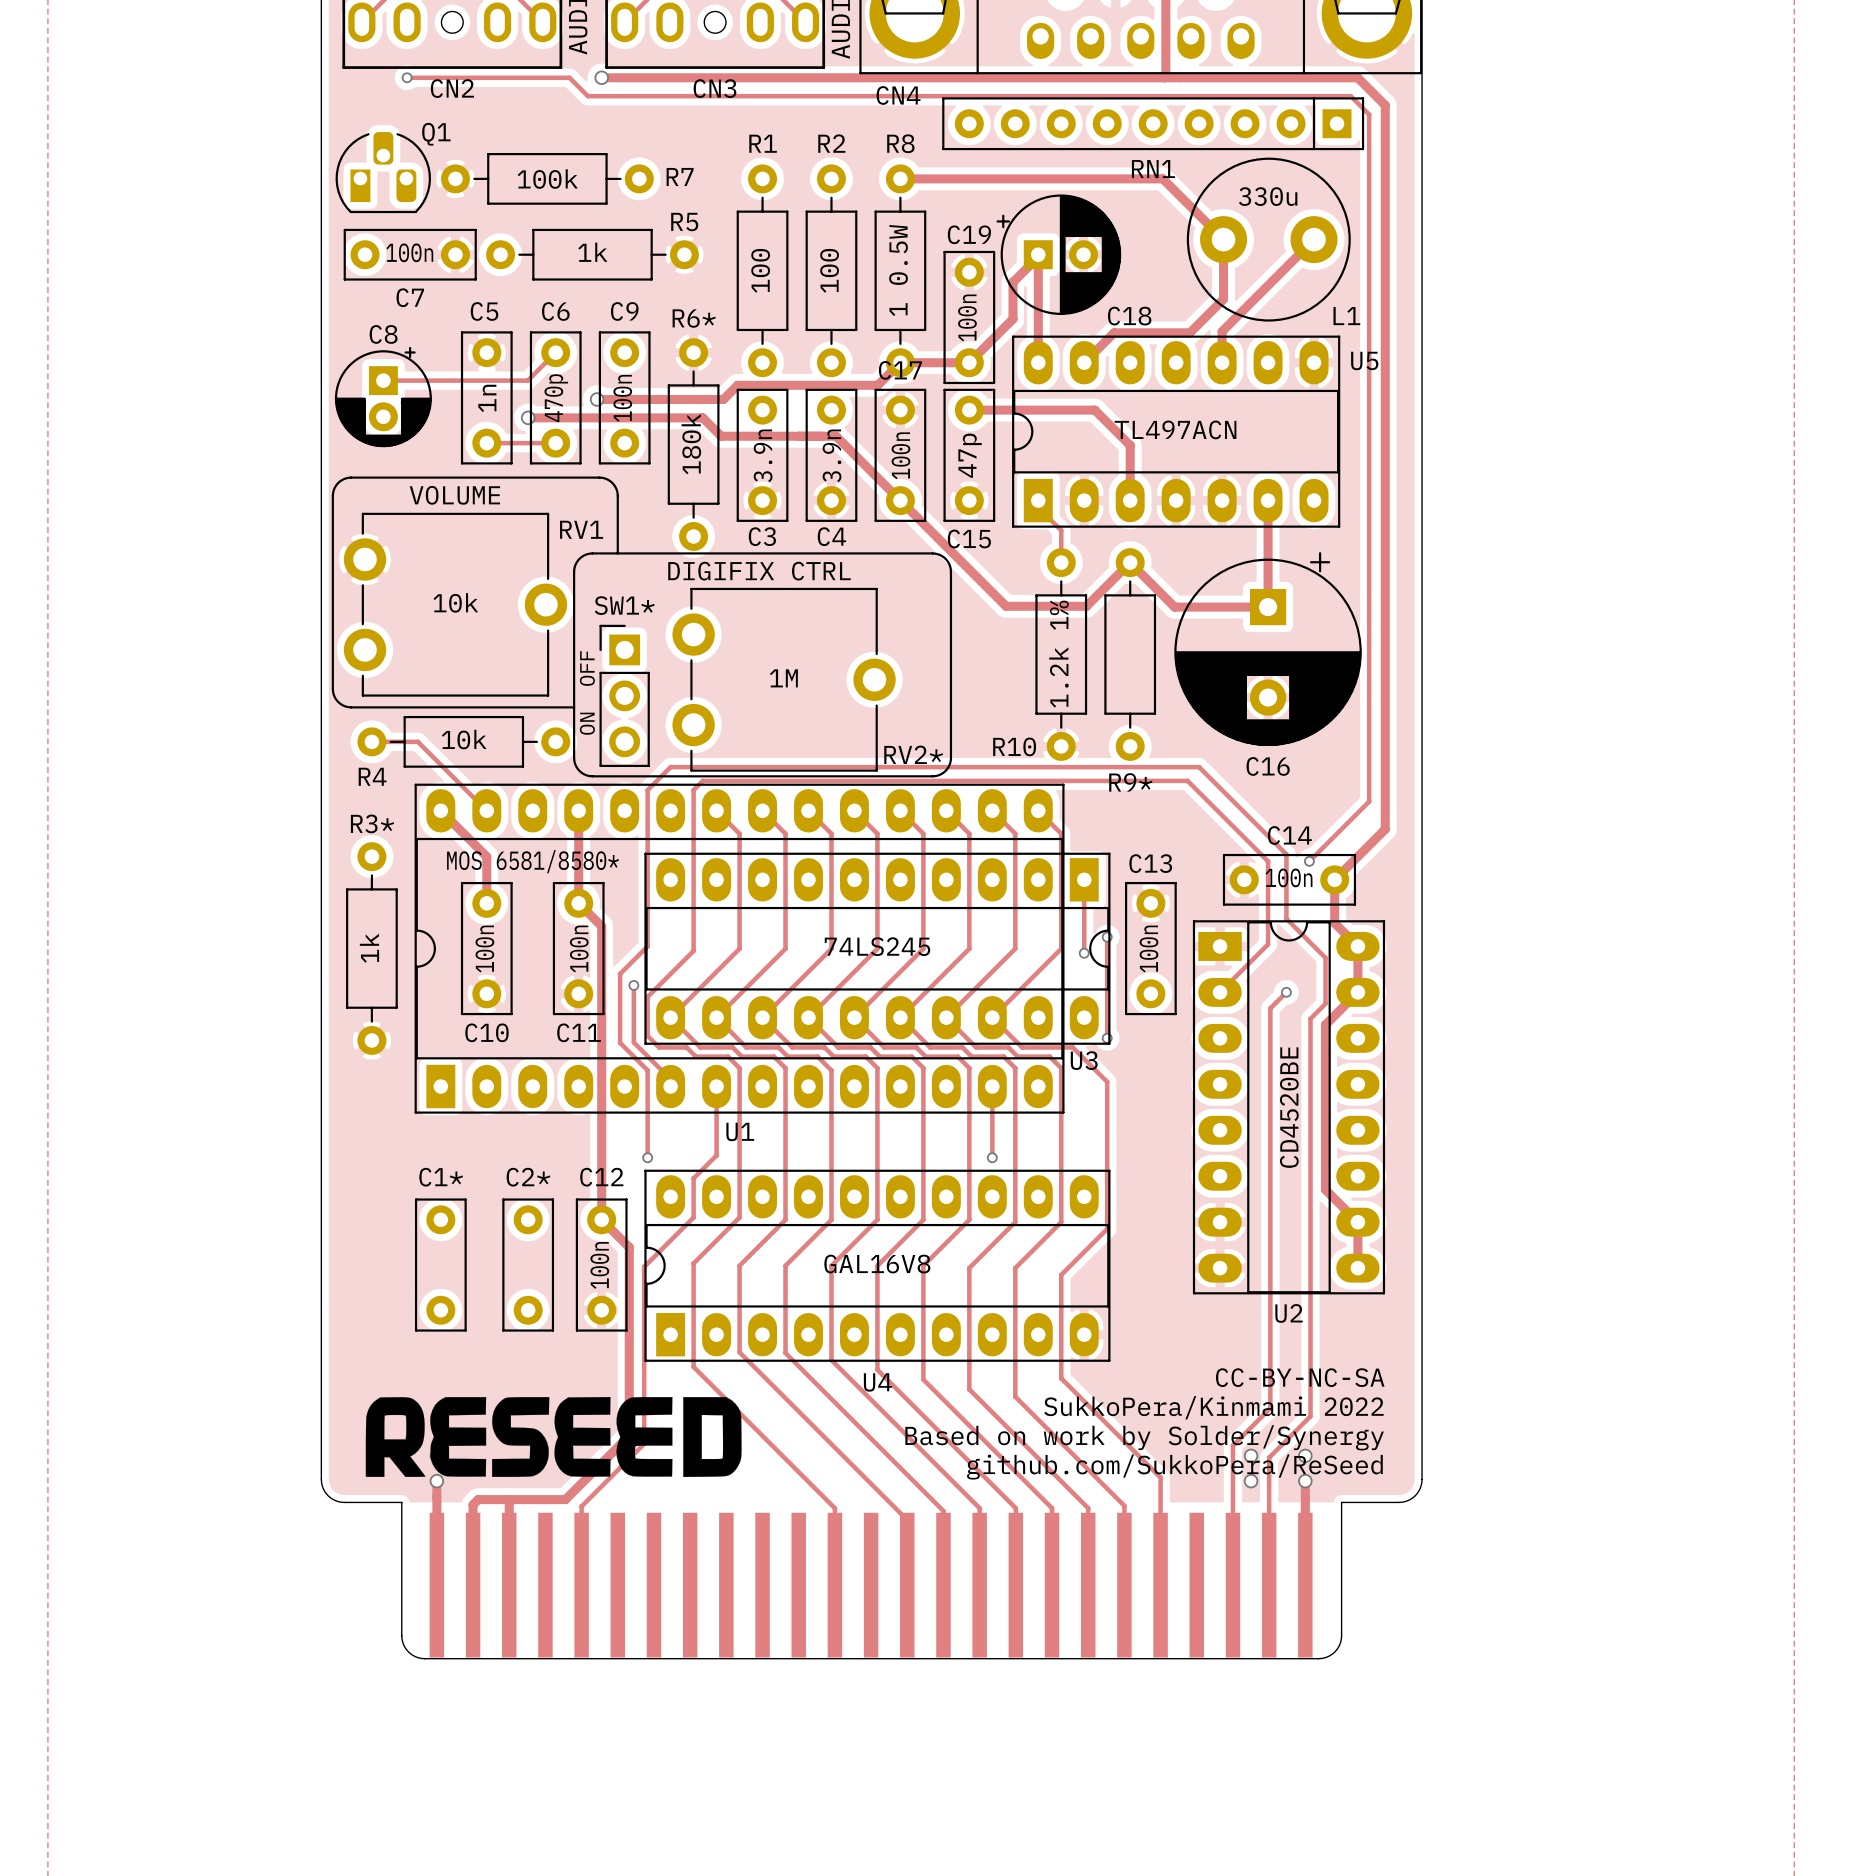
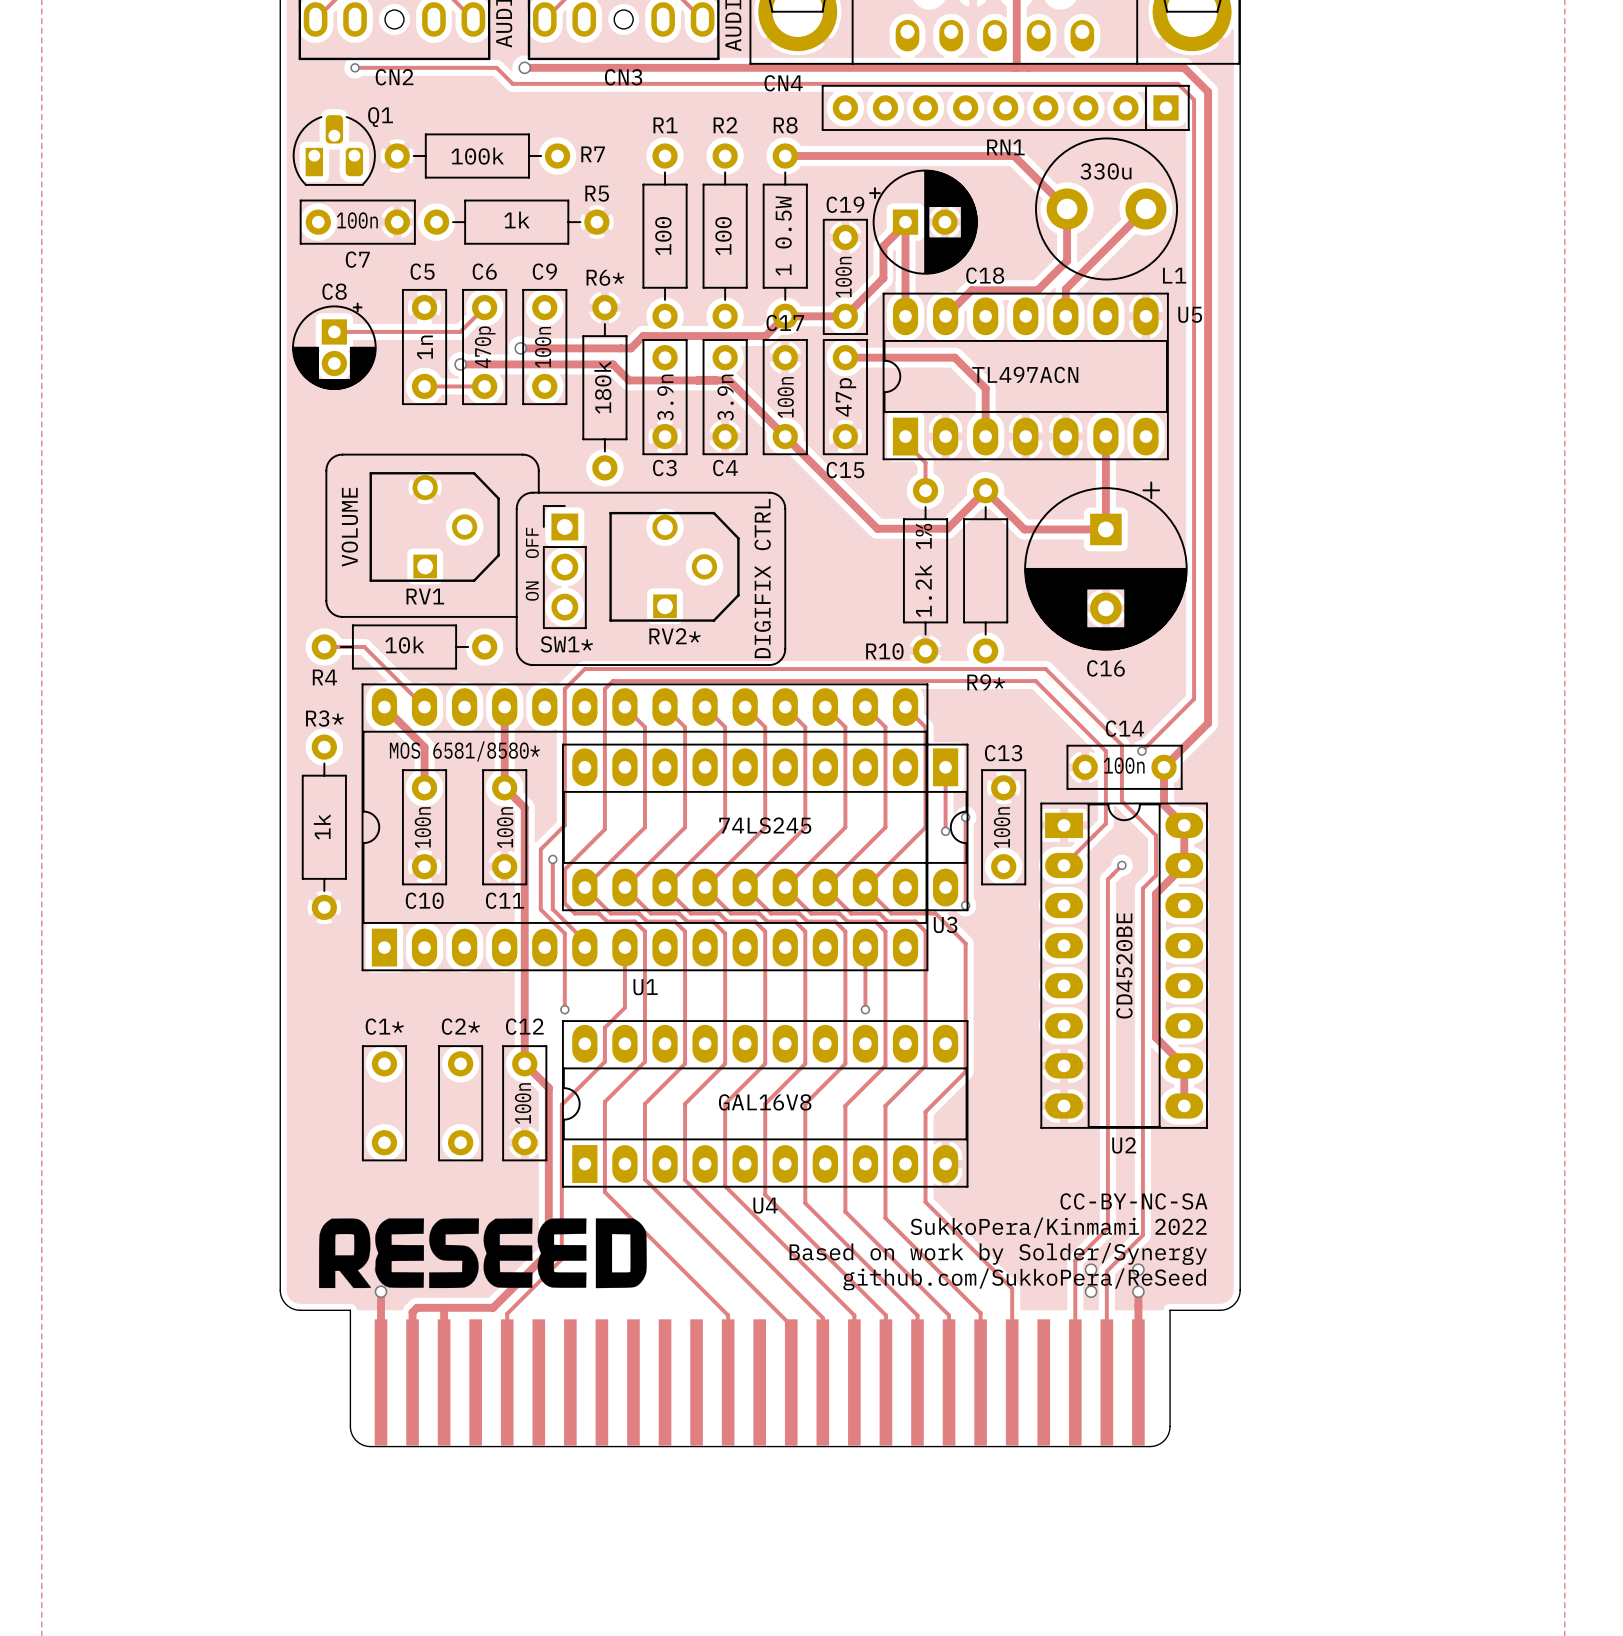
text rotation: 0° (454, 495) -> 90° counterclockwise (349, 527)
RV1 footprint: [343, 512, 568, 697] -> [369, 472, 500, 582]
RV1 name position: RV1 (581, 529) -> RV1 (425, 596)
line: (617, 539) (617, 491) (612, 482) (604, 478) (351, 477) (340, 481) (335, 486) (332, 495) (333, 693) (338, 702) (346, 706) (392, 707) -> (538, 470) (534, 459) (522, 454) (342, 454) (332, 457) (328, 462) (326, 470) (326, 600) (331, 612) (342, 616)
line: none -> (538, 482) (538, 492)
line: (932, 553) (945, 558) (950, 571) (950, 757) (948, 767) (941, 773) (932, 776) (592, 776) (583, 773) (576, 767) (574, 757) (574, 571) (576, 562) (583, 555) (592, 553) (932, 553) -> none
text rotation: 0° (759, 571) -> 90° counterclockwise (762, 578)
RV1 value: 10k (455, 602) -> none
text position: SW1* (624, 605) -> SW1* (566, 644)
part: none -> (674, 566)
text position: OFF (587, 668) -> OFF (532, 542)
part: 1M (784, 679) -> none
part position: (624, 695) -> (564, 567)
line: none -> (500, 616) (516, 616)
text position: ON (587, 723) -> ON (532, 591)
text position: RV2* (913, 754) -> RV2* (675, 636)
line: none -> (530, 665) (769, 665) (777, 662) (783, 657) (785, 648) (785, 508) (783, 500) (777, 494) (769, 492) (532, 492) (524, 494) (518, 500) (516, 508) (516, 648) (521, 660) (532, 665)

